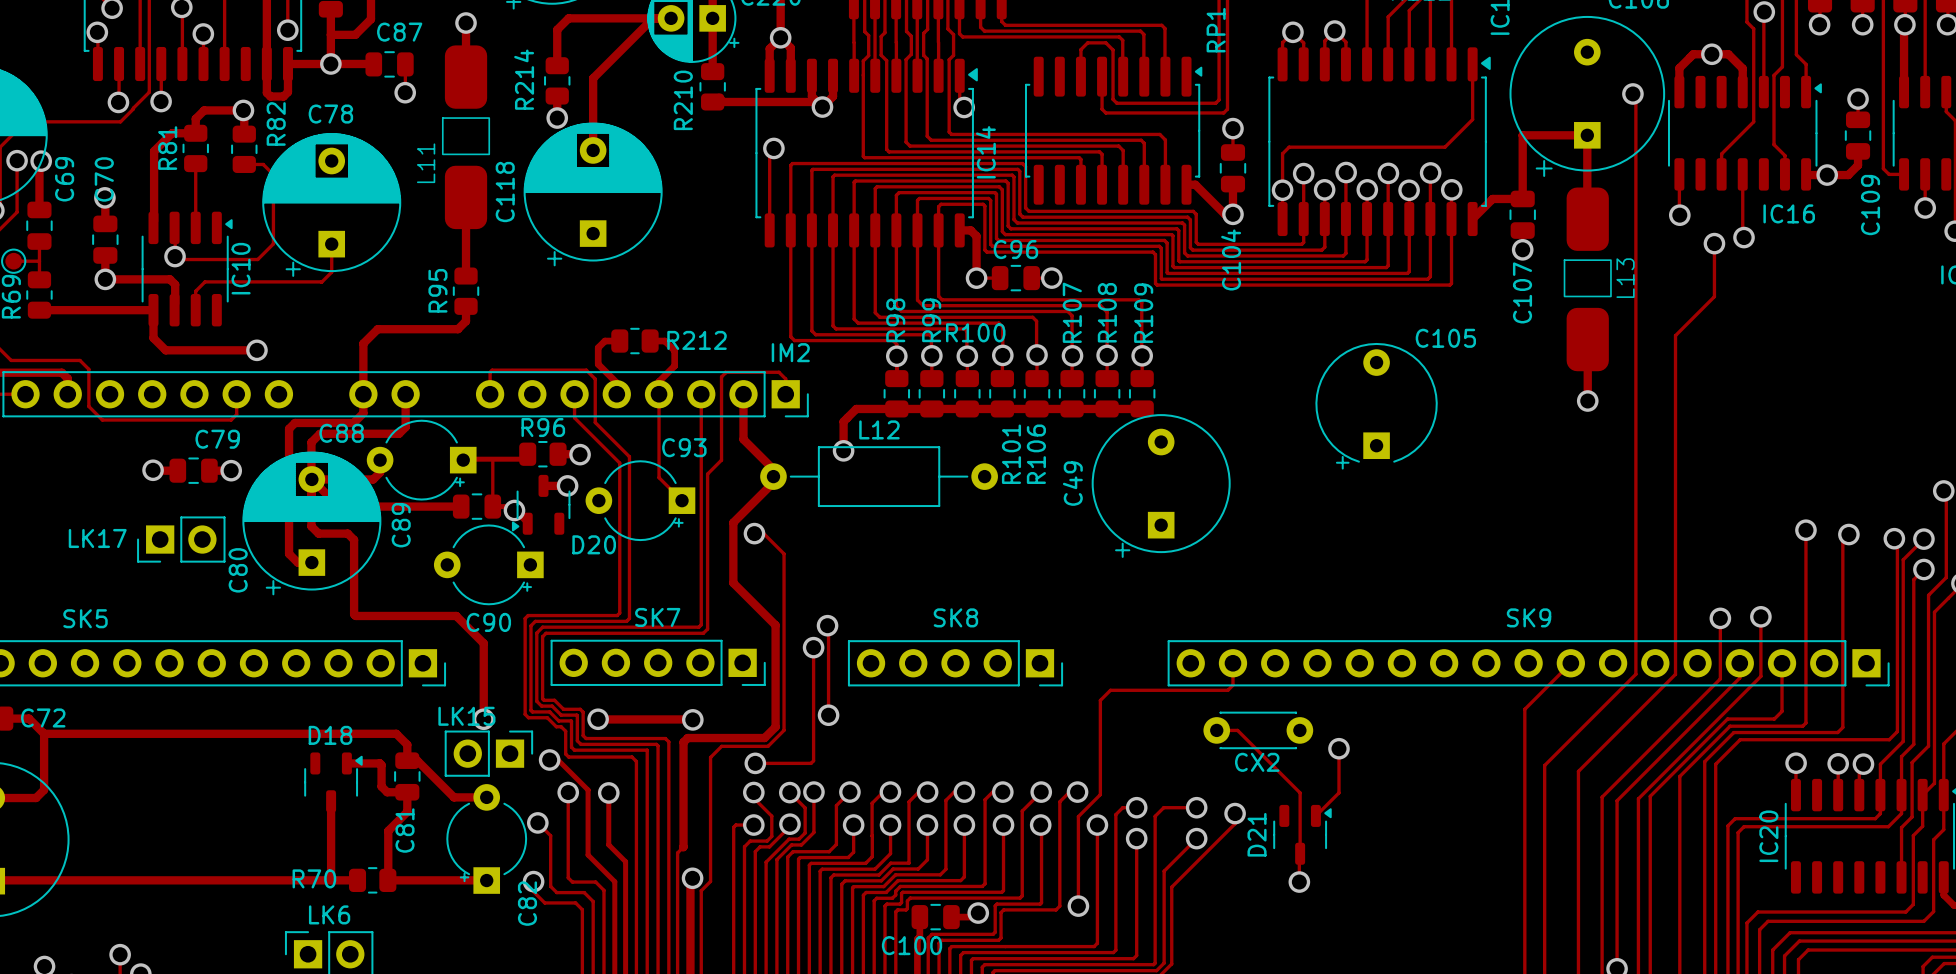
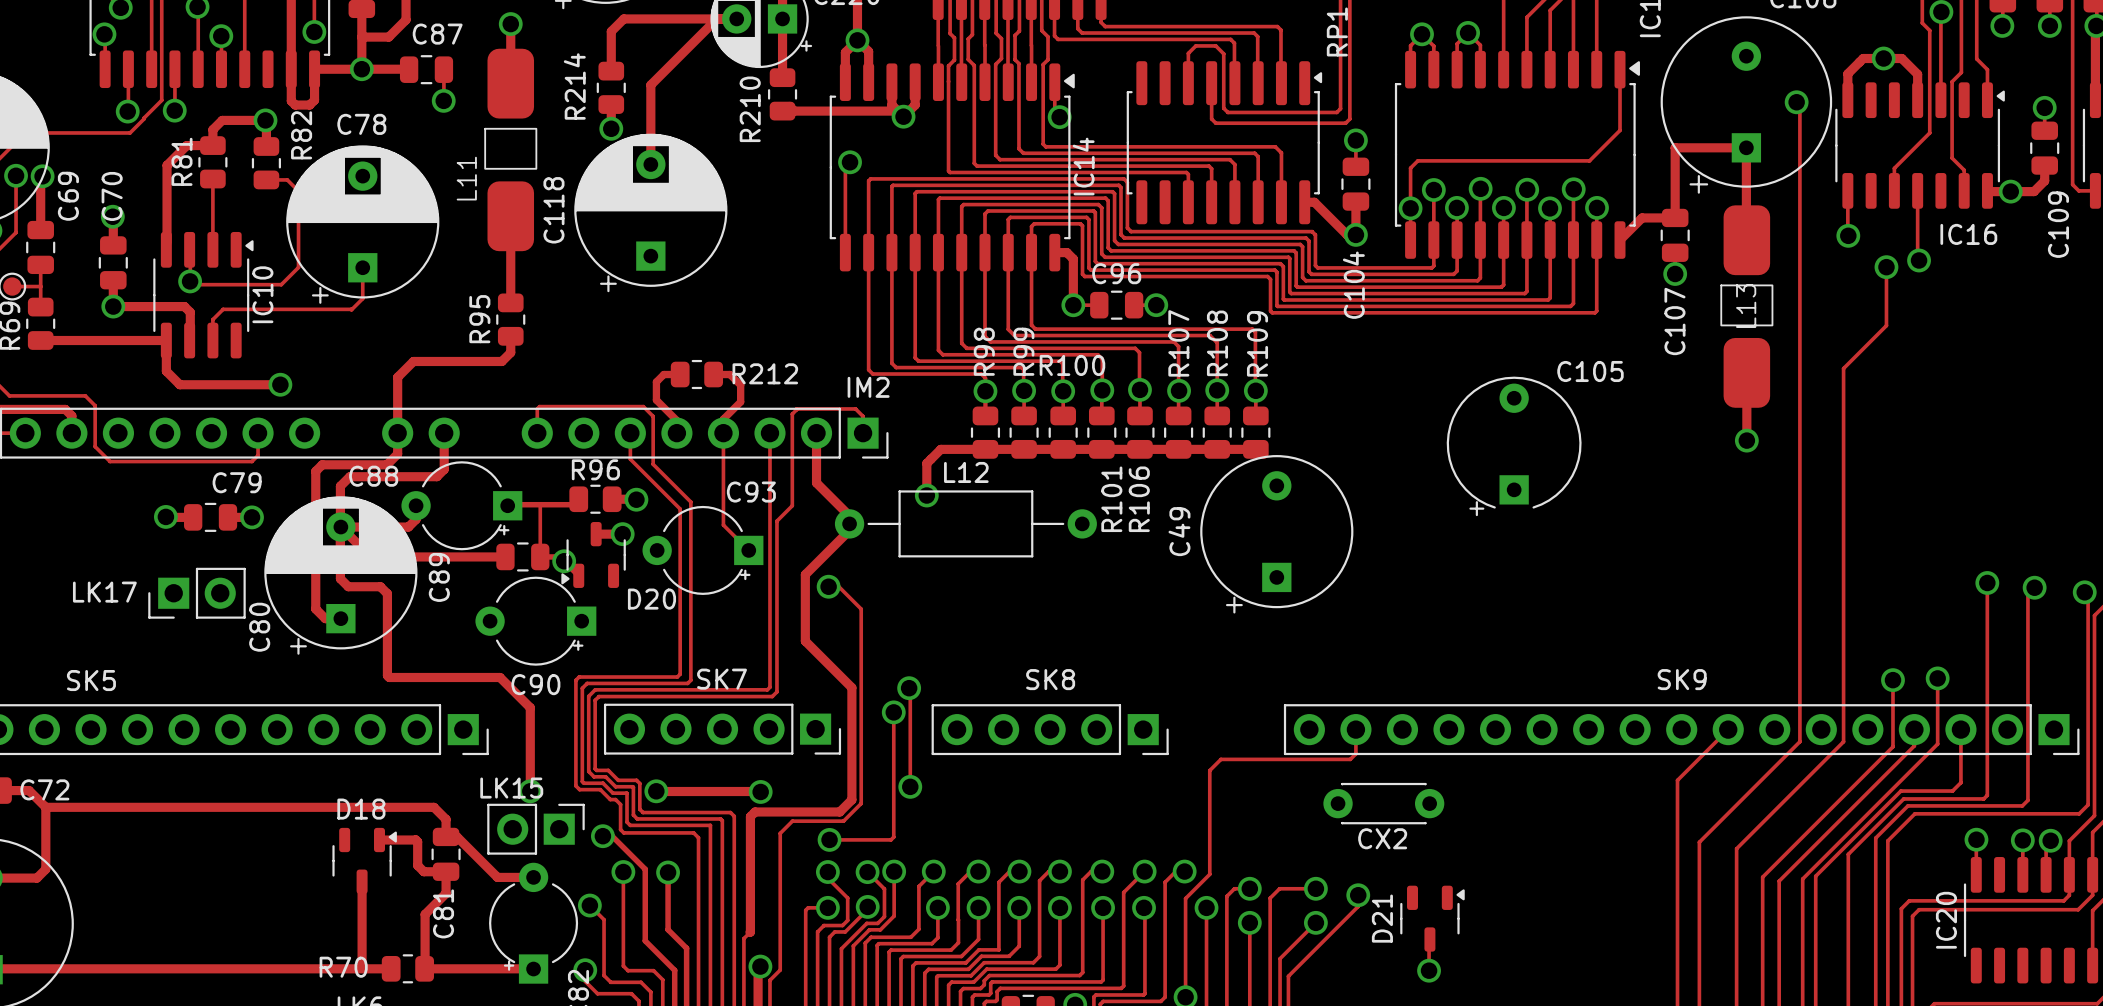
L13 name position: L13 (1625, 278) -> L13 (1746, 306)
track: (1216, 730) (1237, 730) (1300, 792) (1300, 853) -> none
track: (1338, 748) (1338, 792) (1315, 815) -> none
via: (1338, 748) -> none

